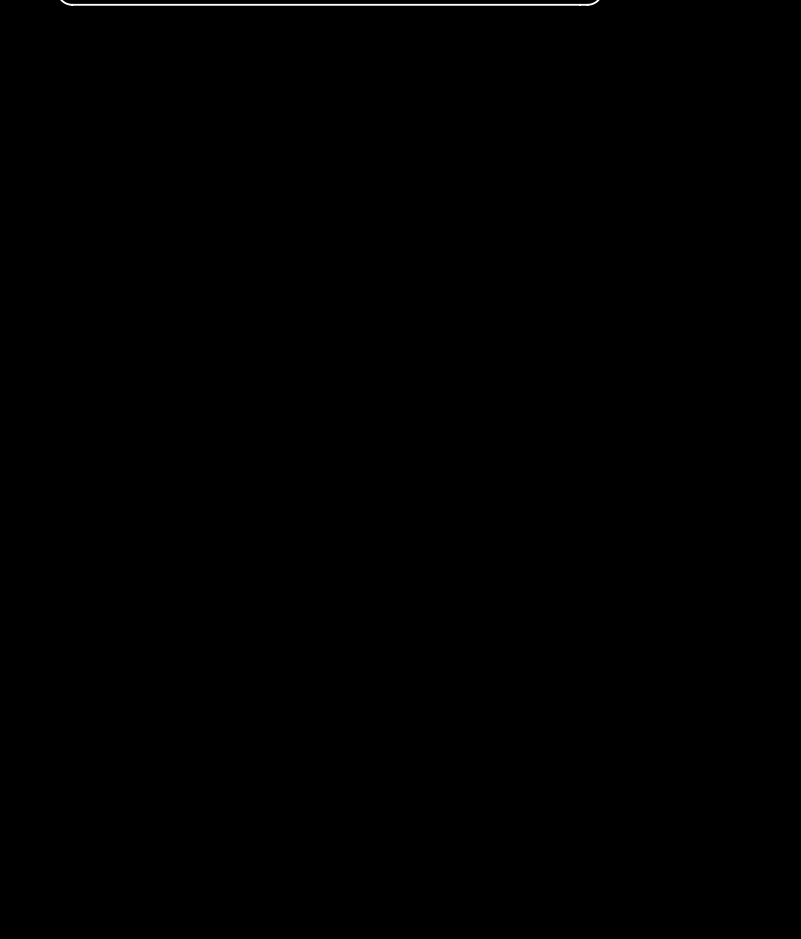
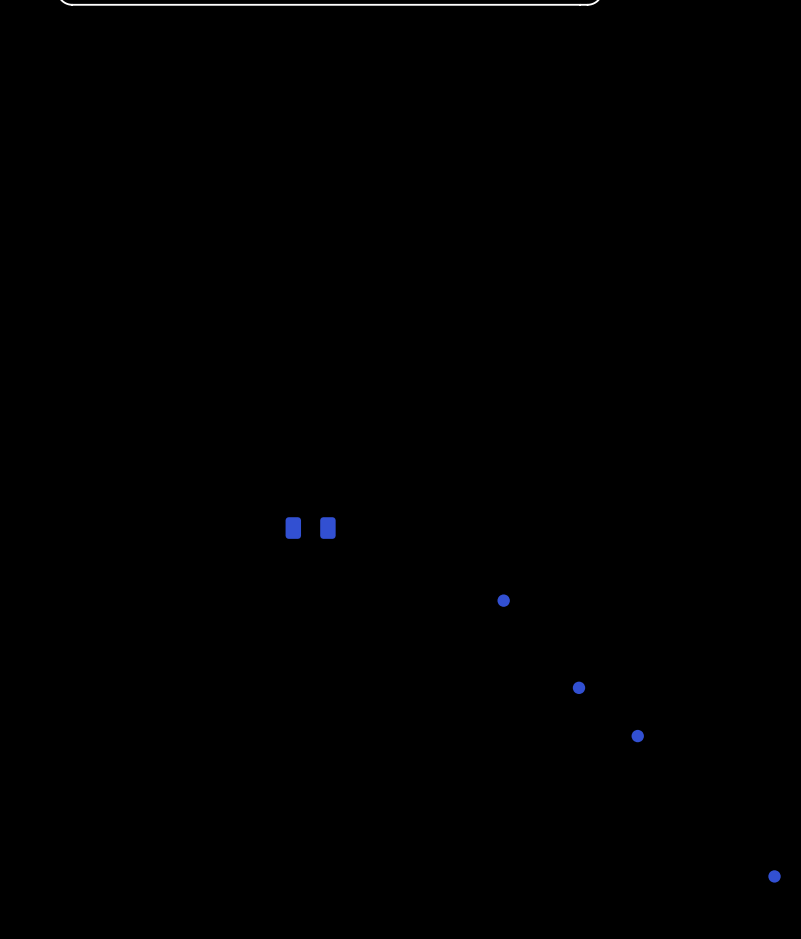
part: none -> (310, 528)
part: none -> (503, 600)
part: none -> (578, 687)
part: none -> (637, 736)
part: none -> (774, 876)

